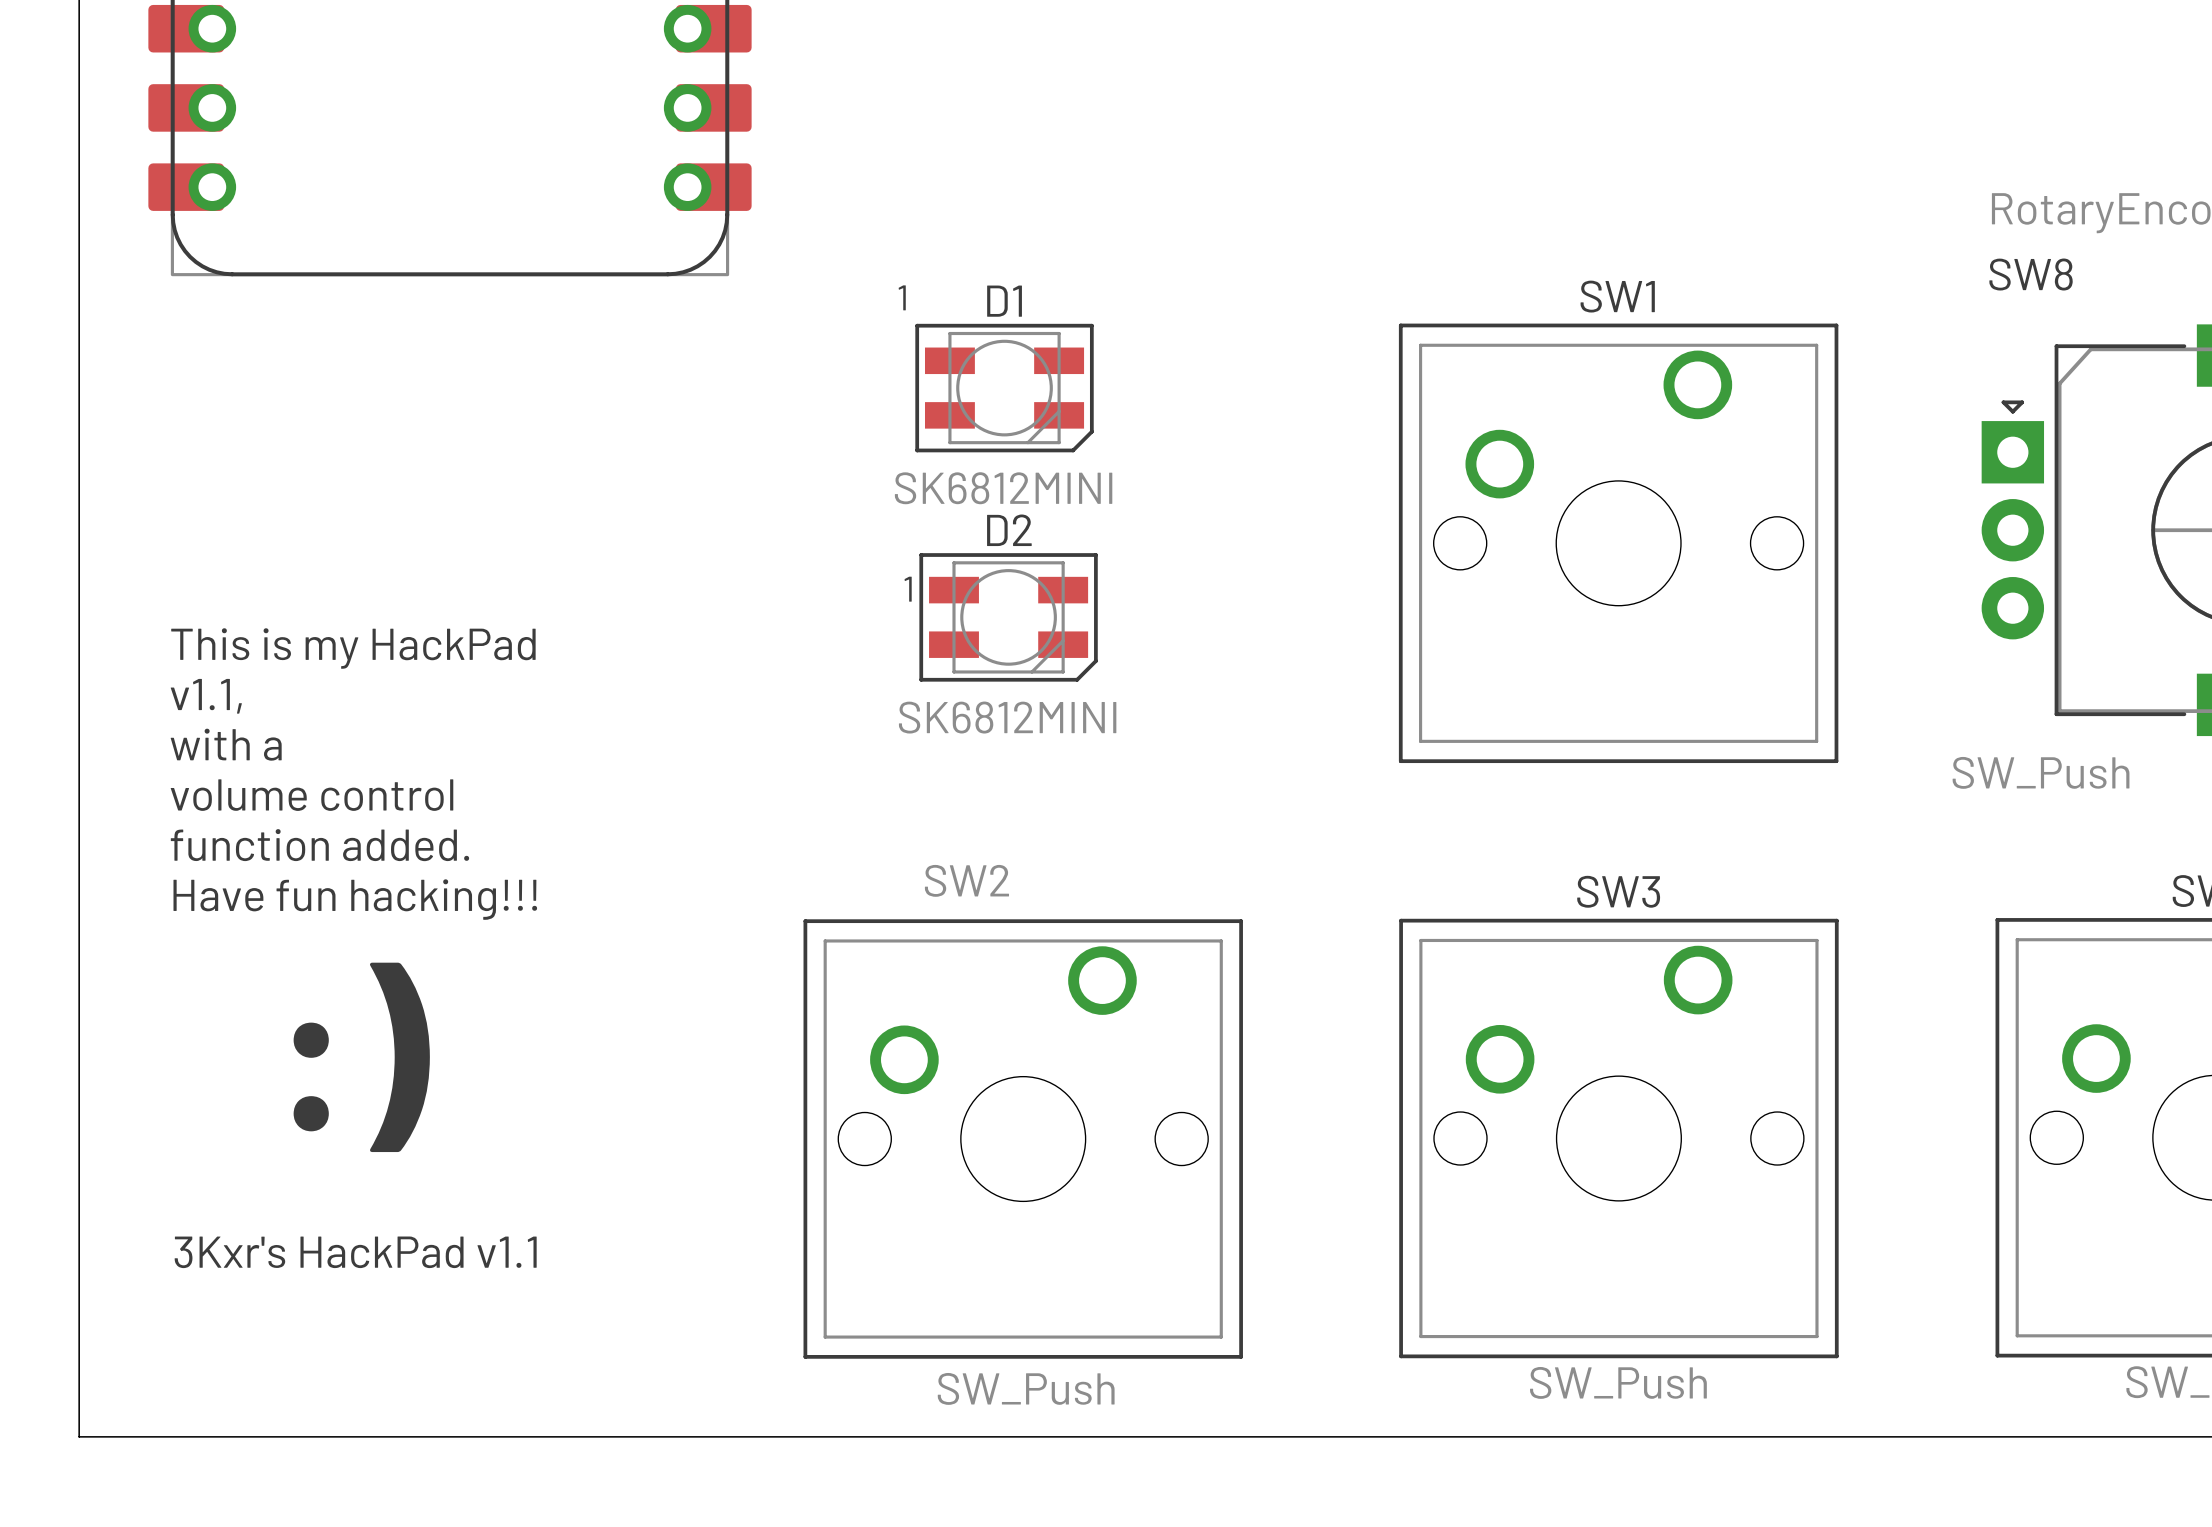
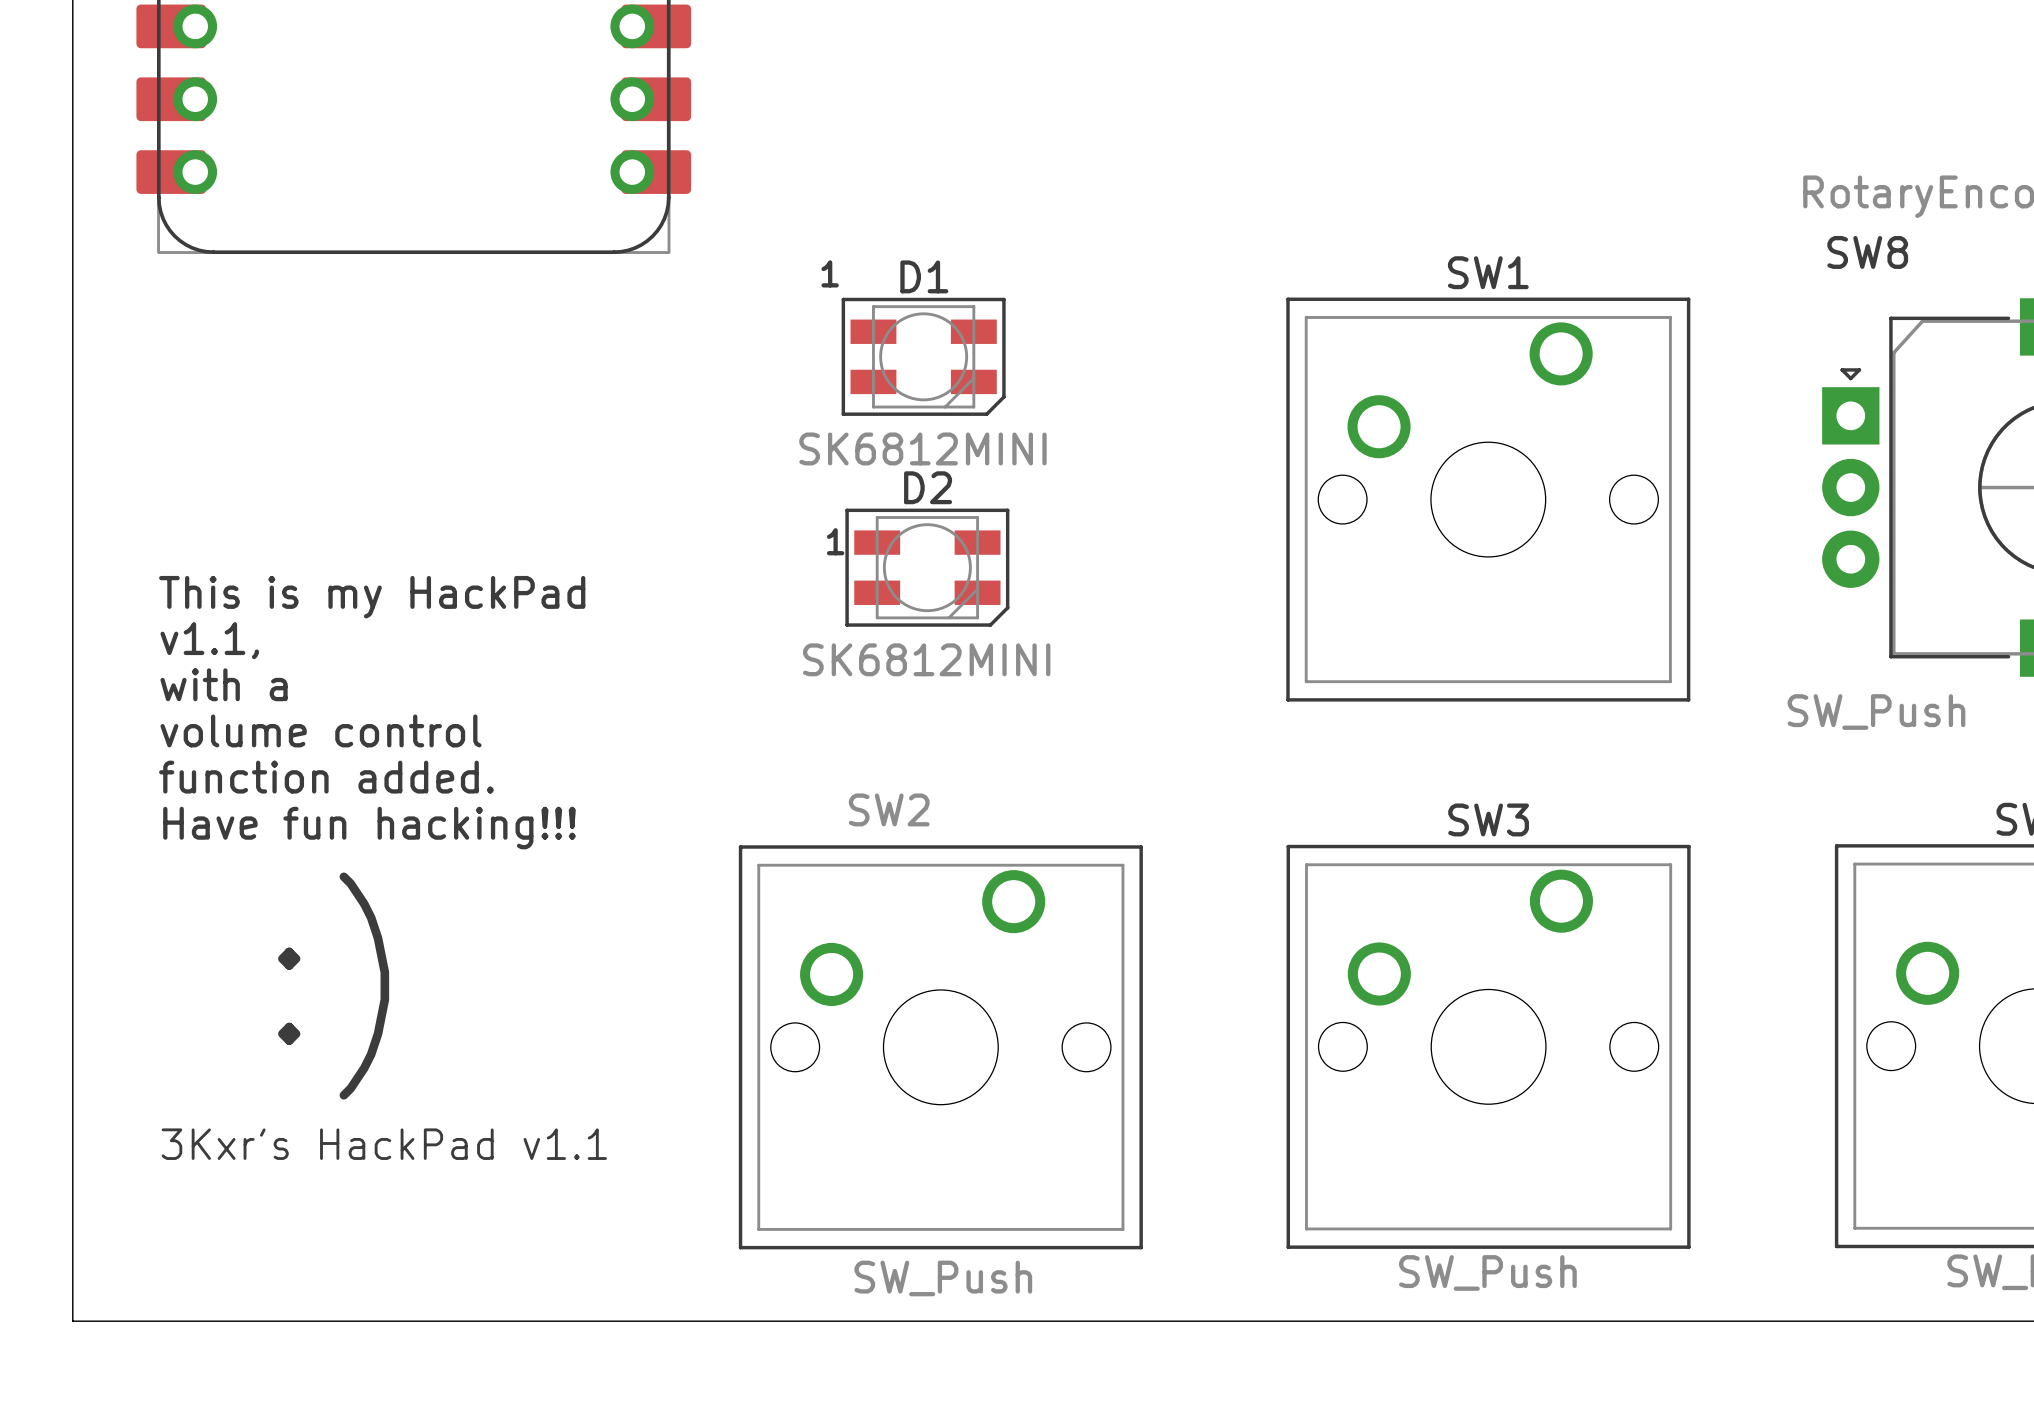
text position: 3Kxr's HackPad v1.1 (355, 1252) -> 3Kxr's HackPad v1.1 (384, 1144)

